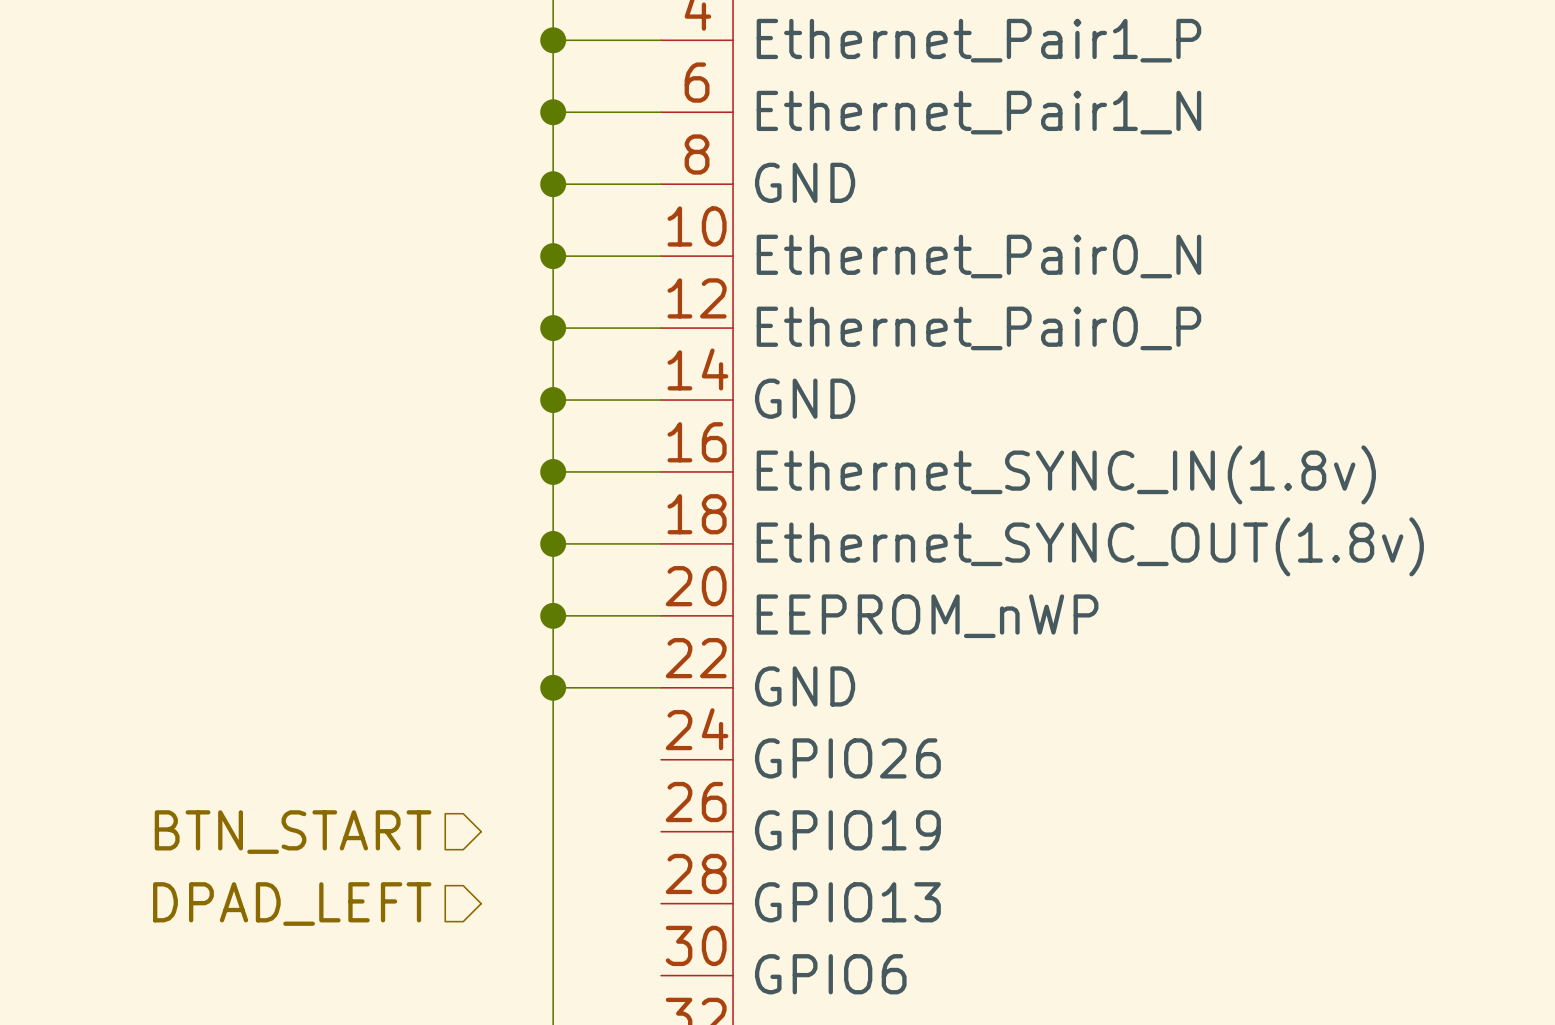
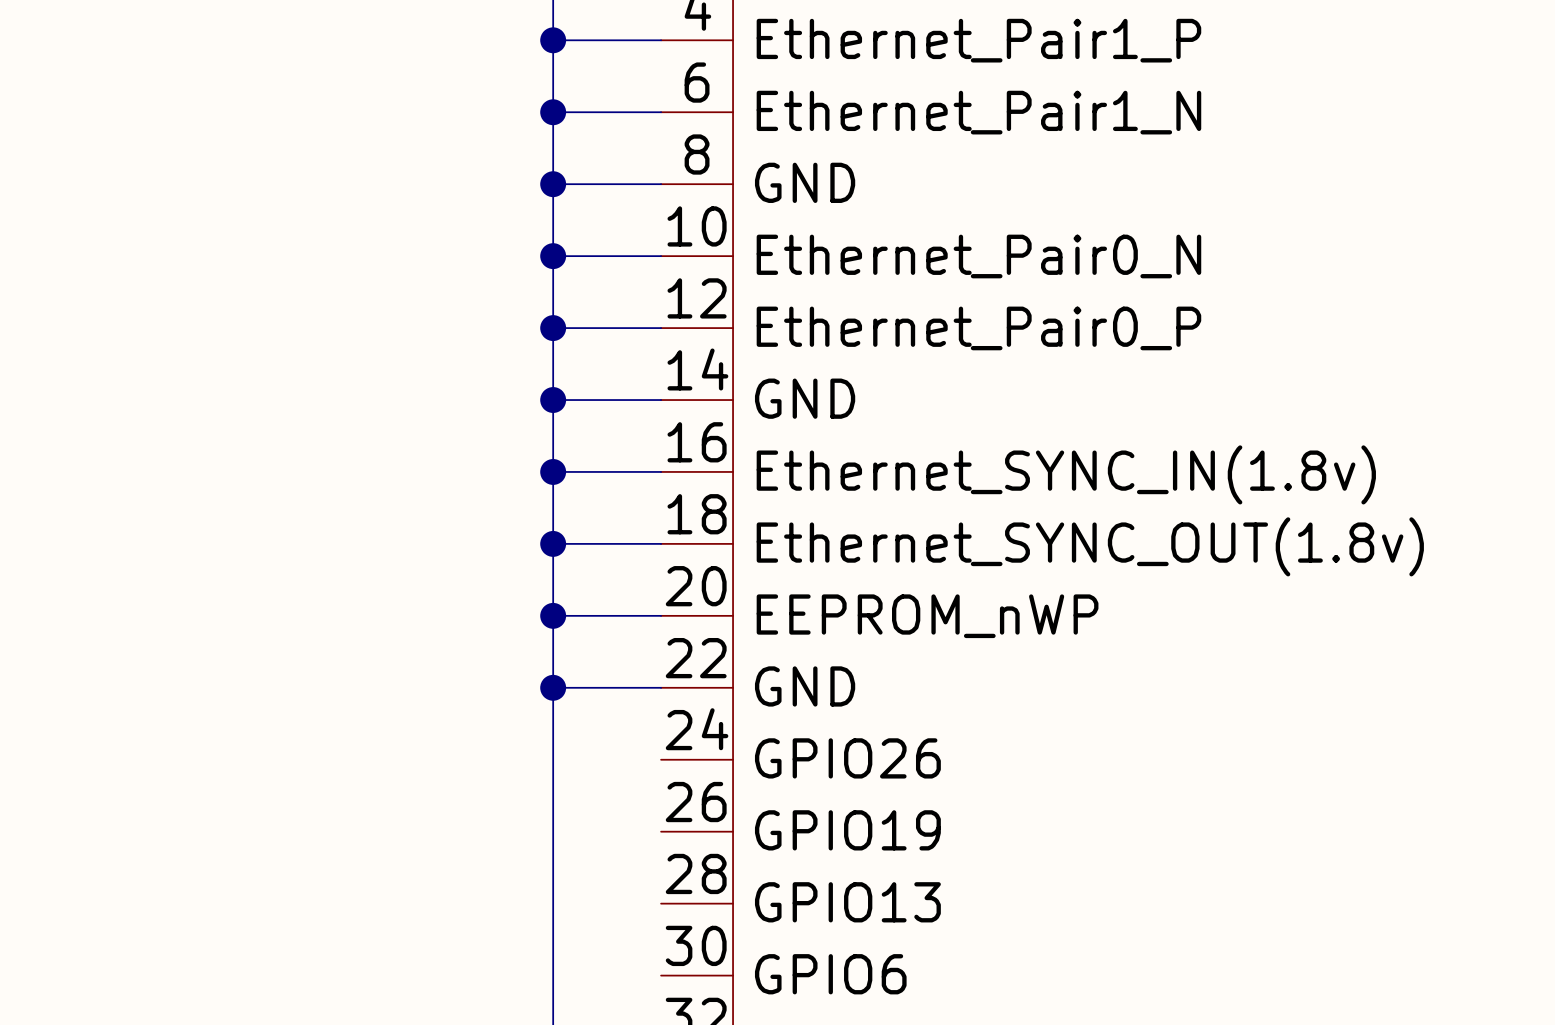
hierarchical label: BTN_START (293, 832) -> none
hierarchical label: DPAD_LEFT (292, 904) -> none

